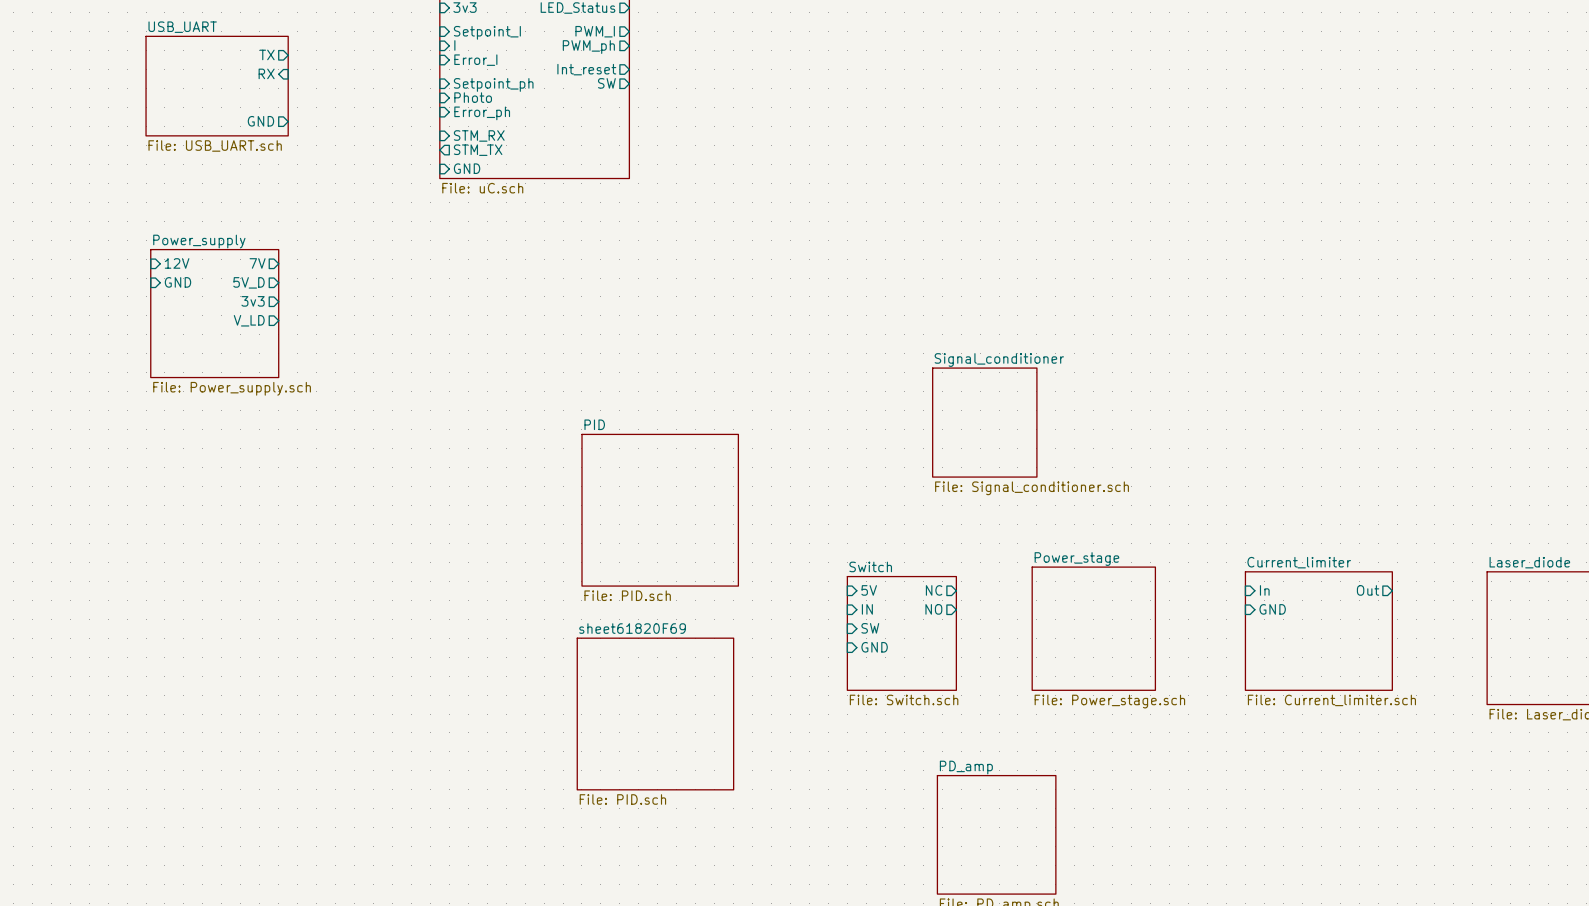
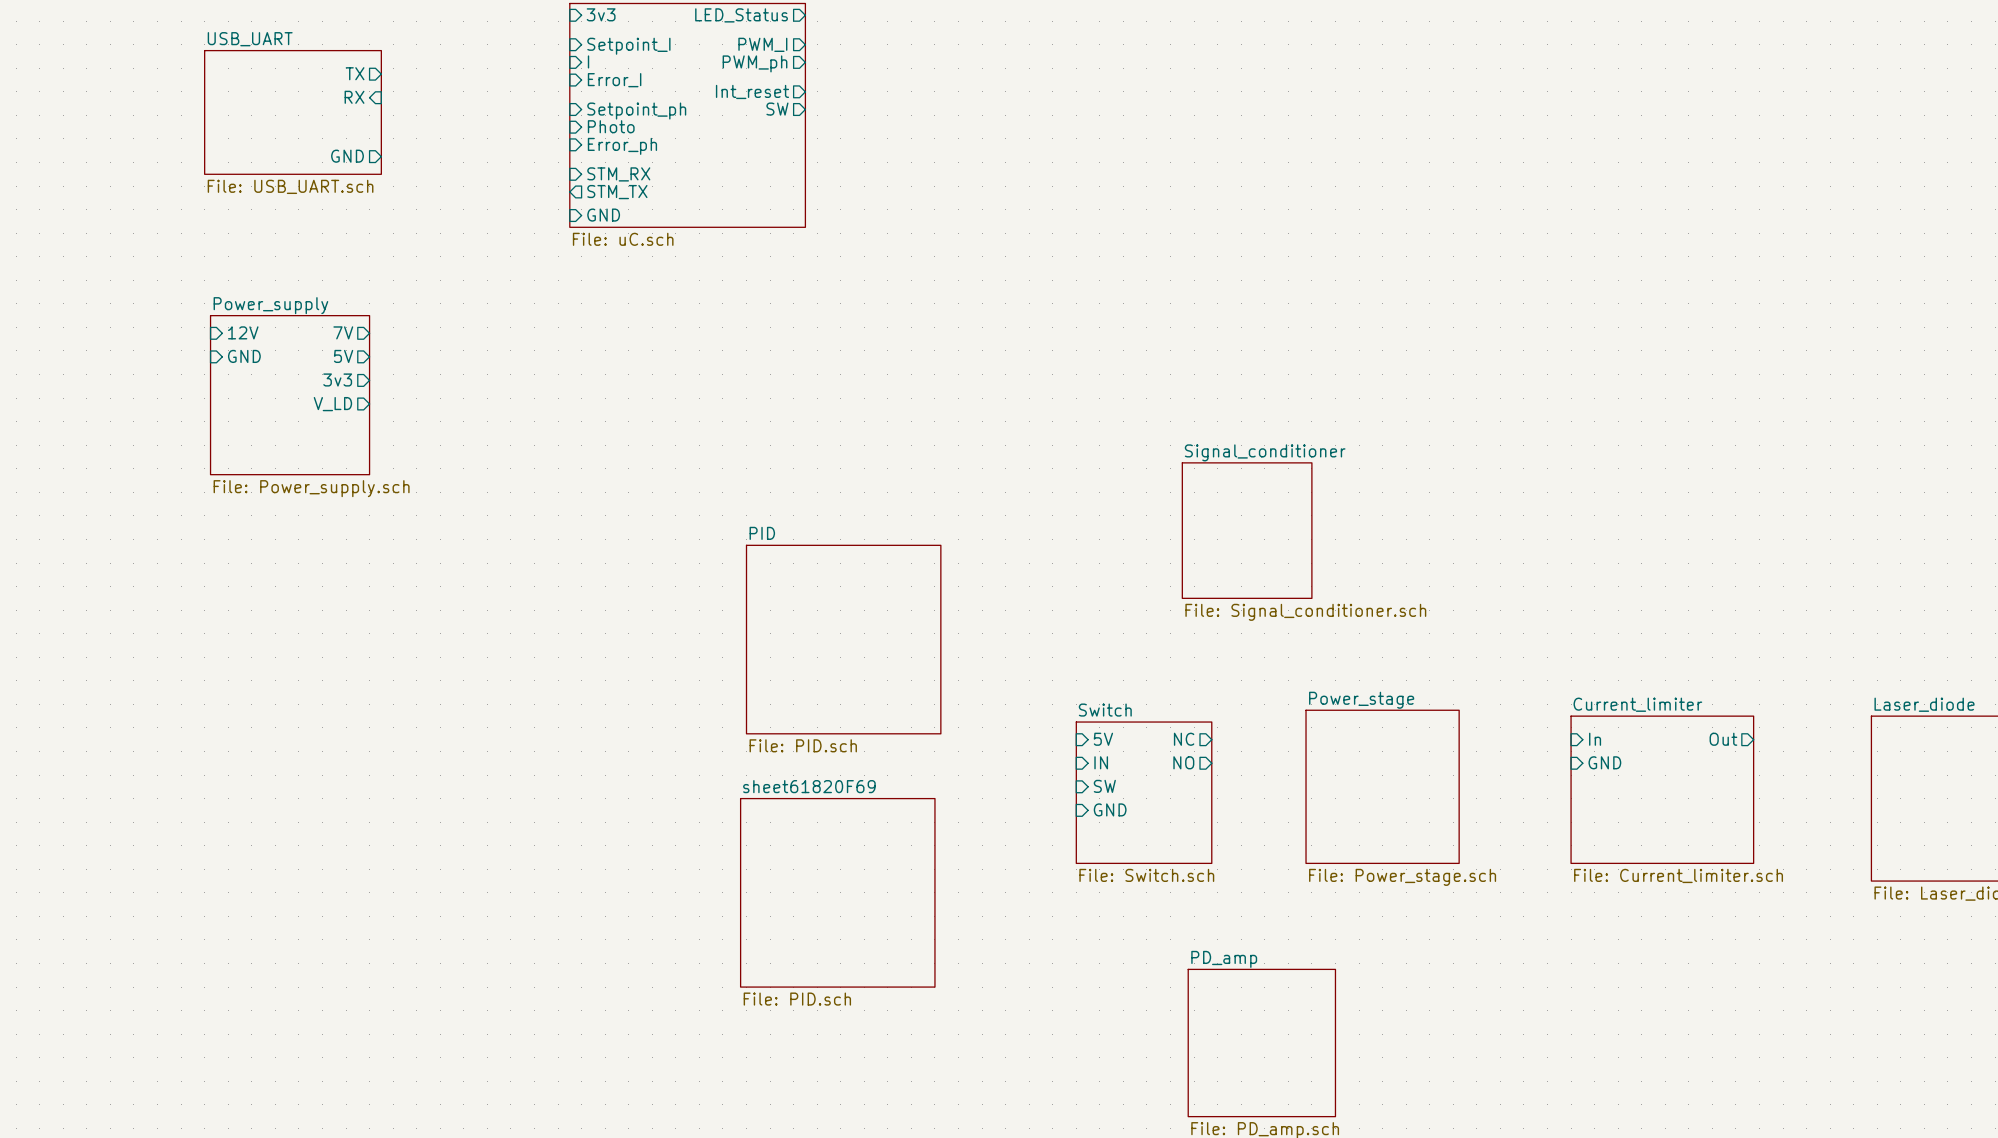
sheet pin: 5V_D (249, 282) -> 5V (343, 356)

